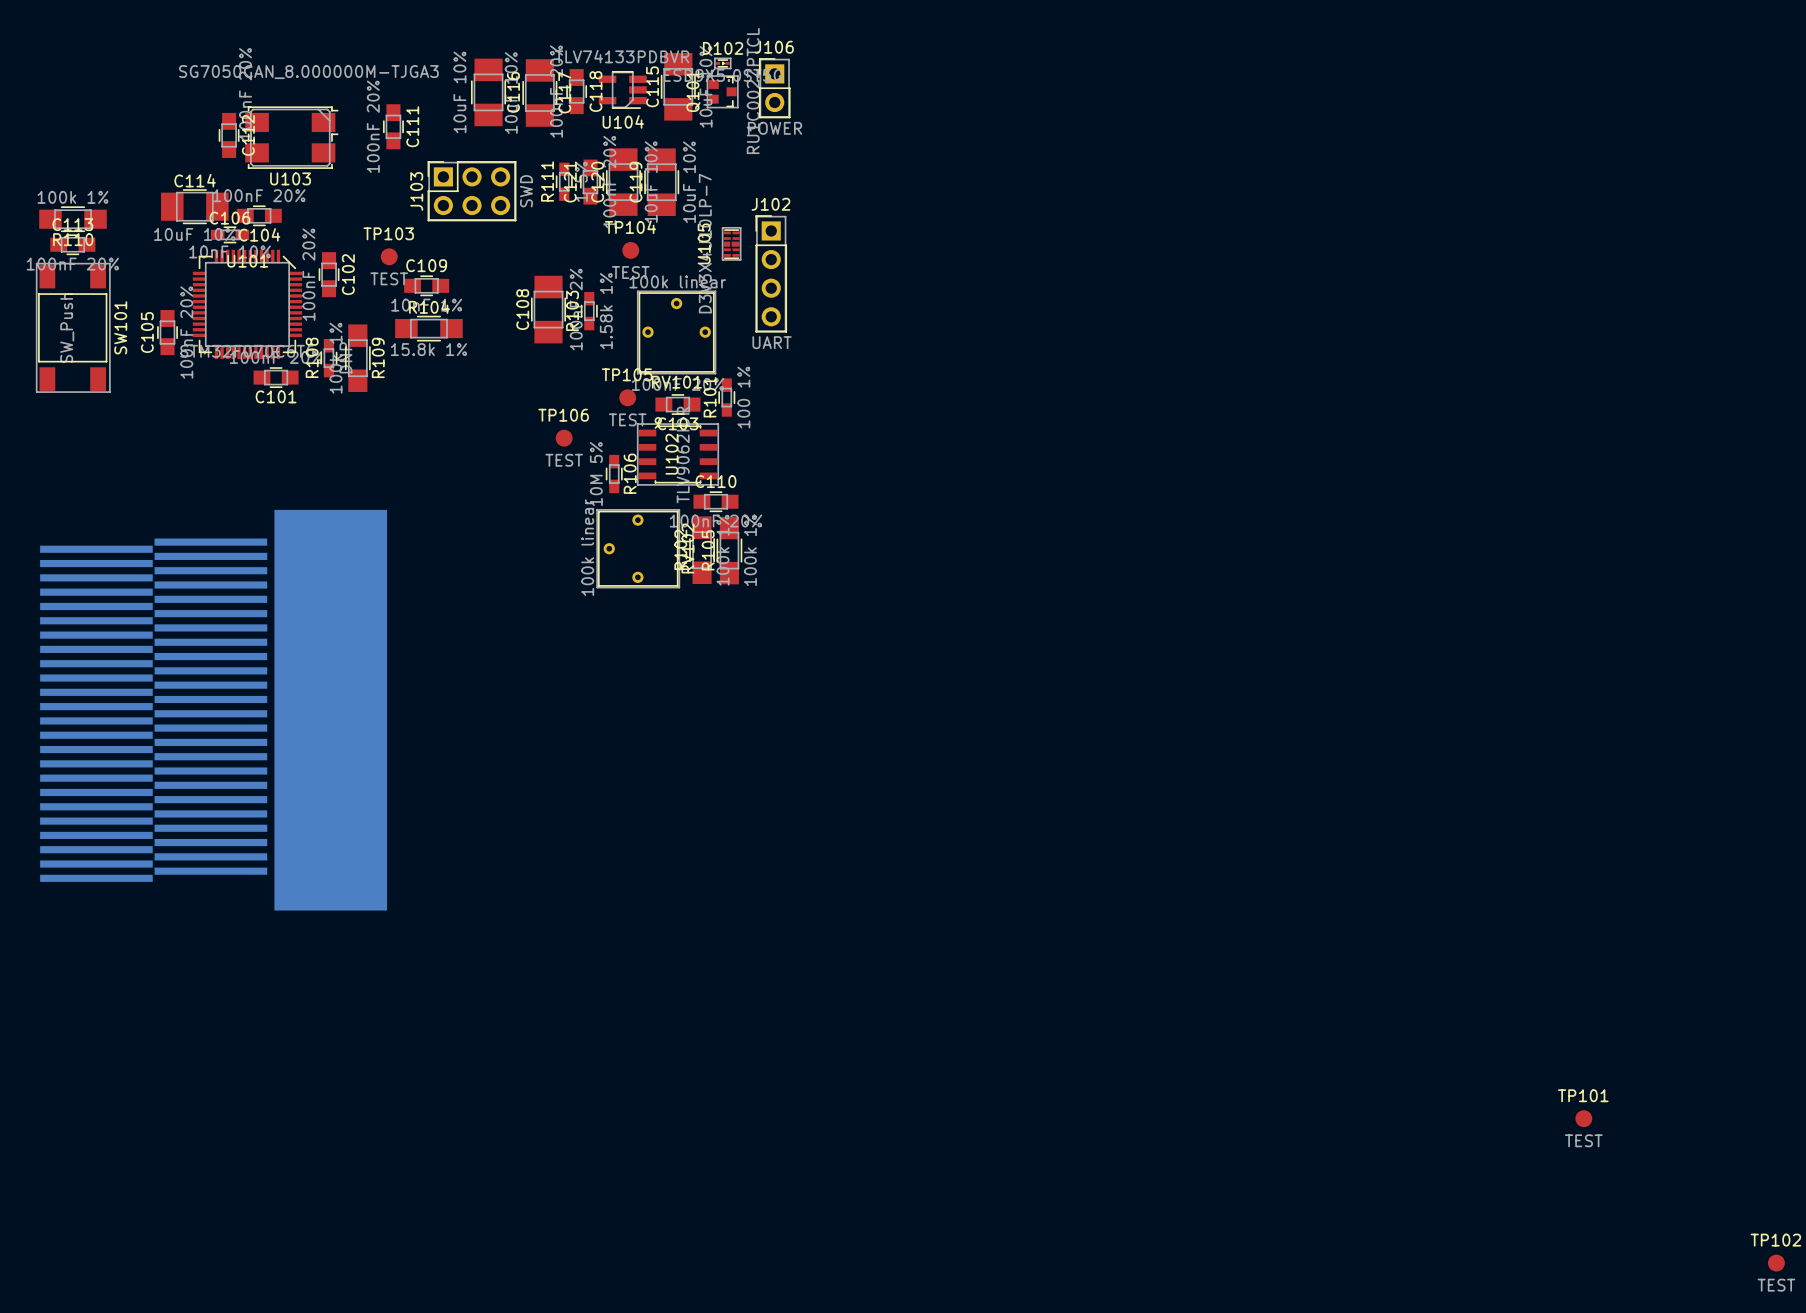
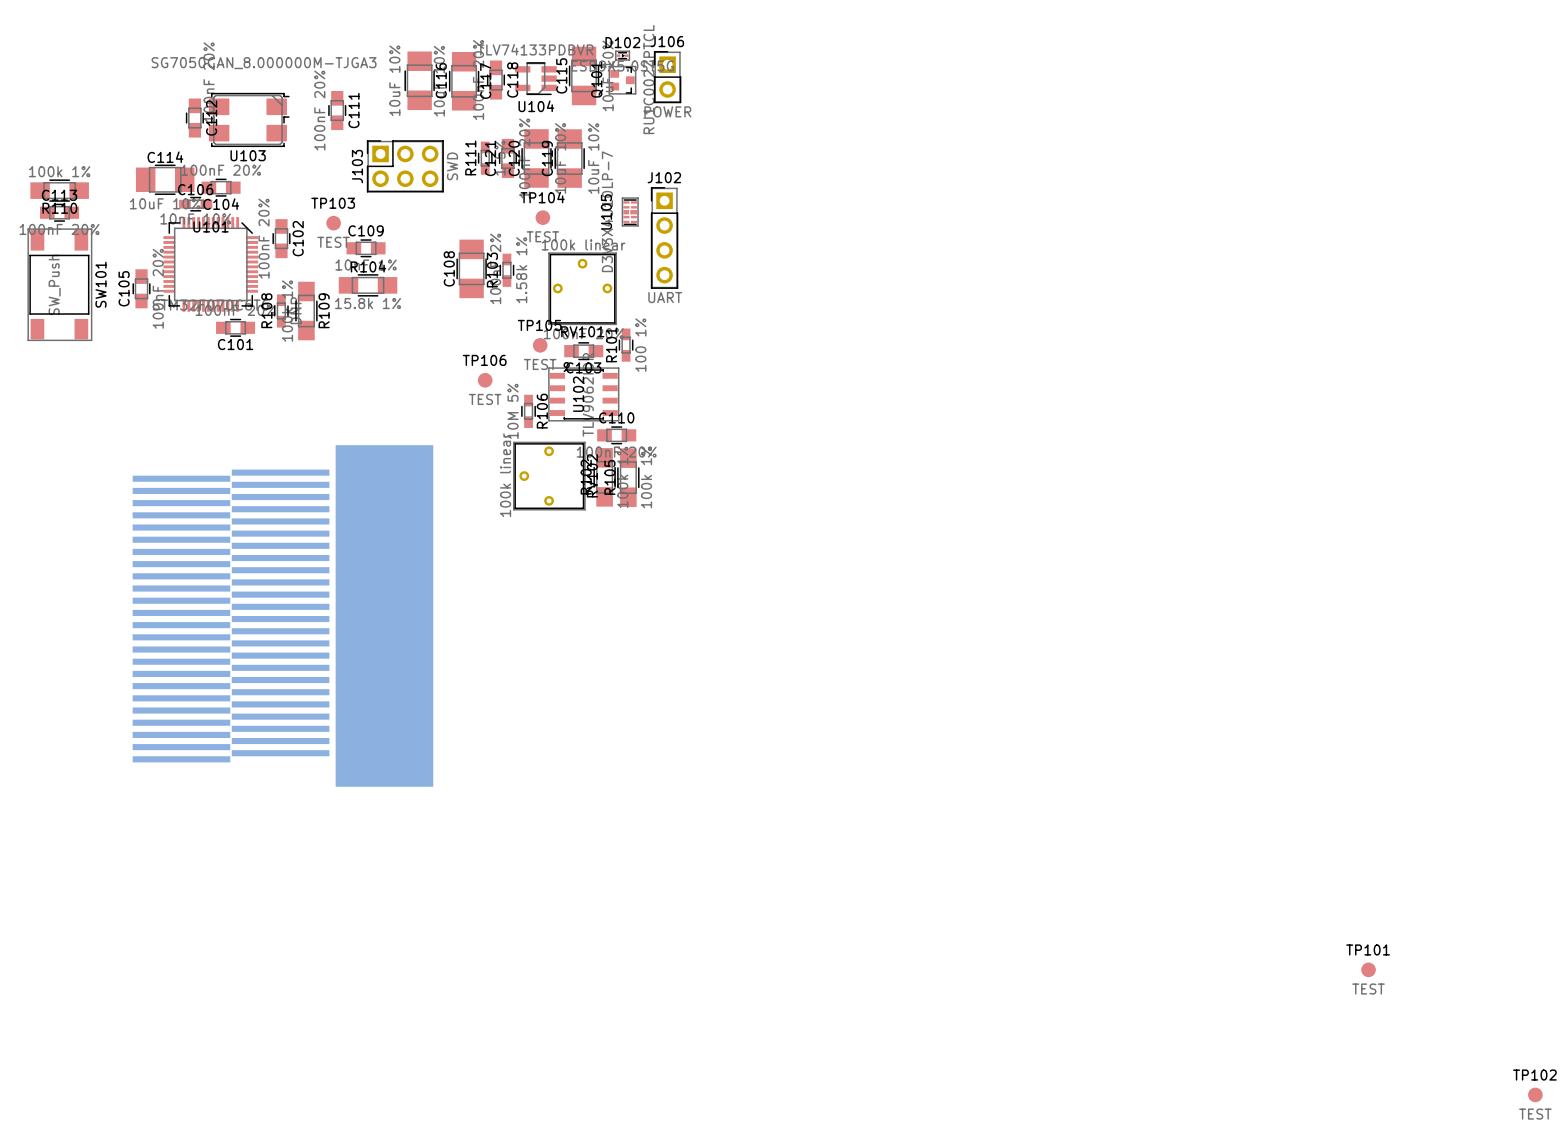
part: (153, 710) -> none
part: none -> (231, 615)
part: (330, 710) -> none
part: none -> (384, 615)

